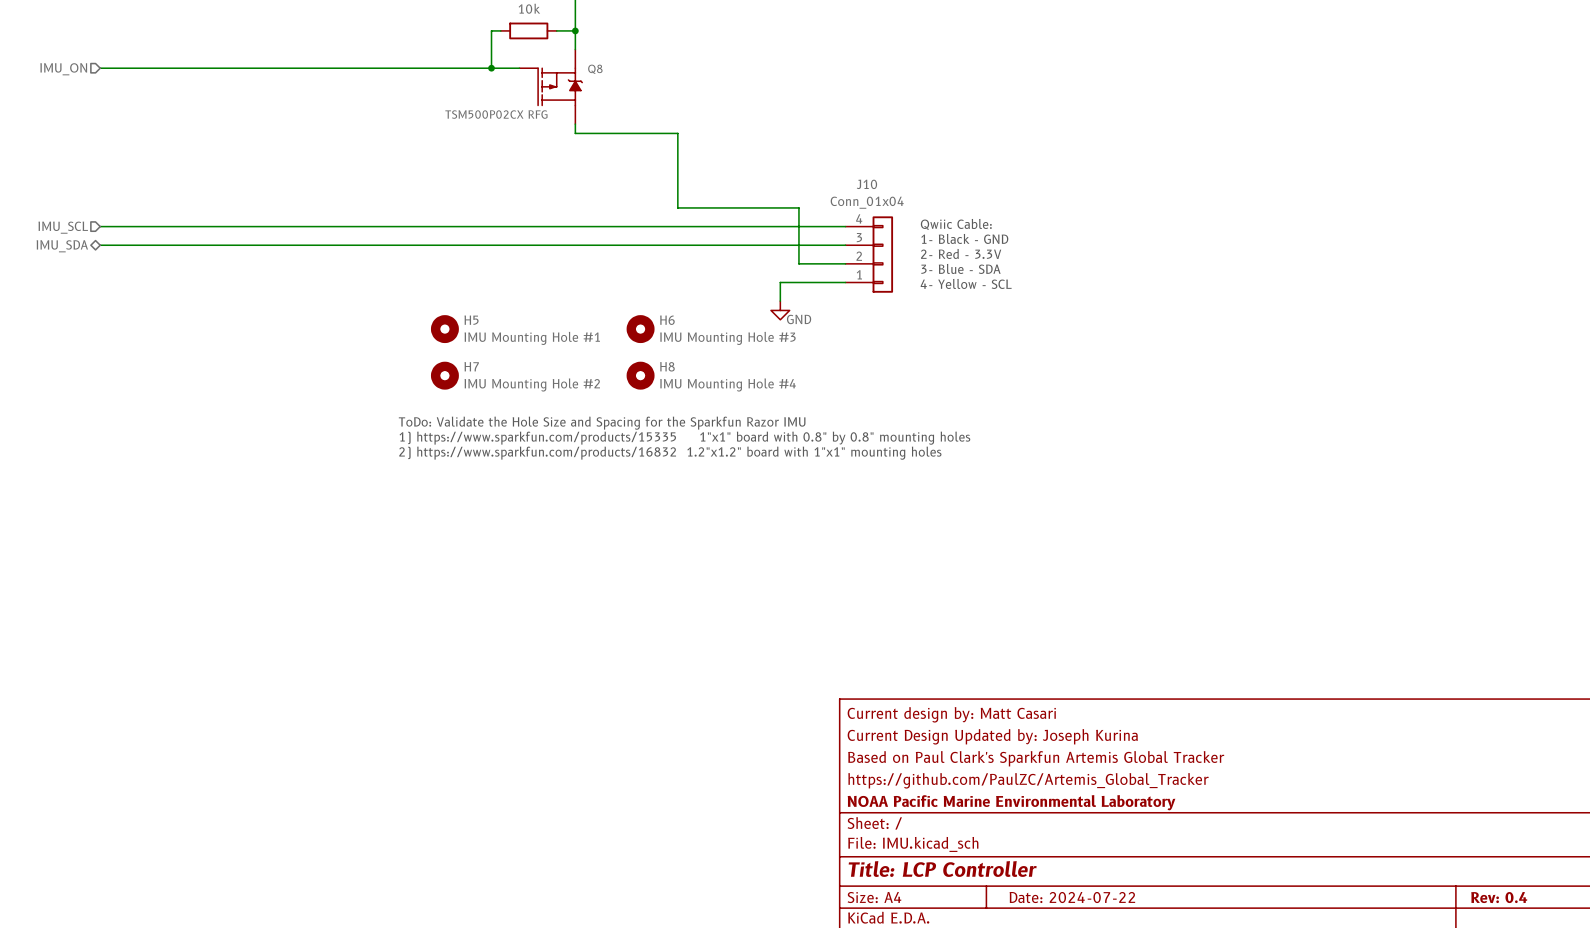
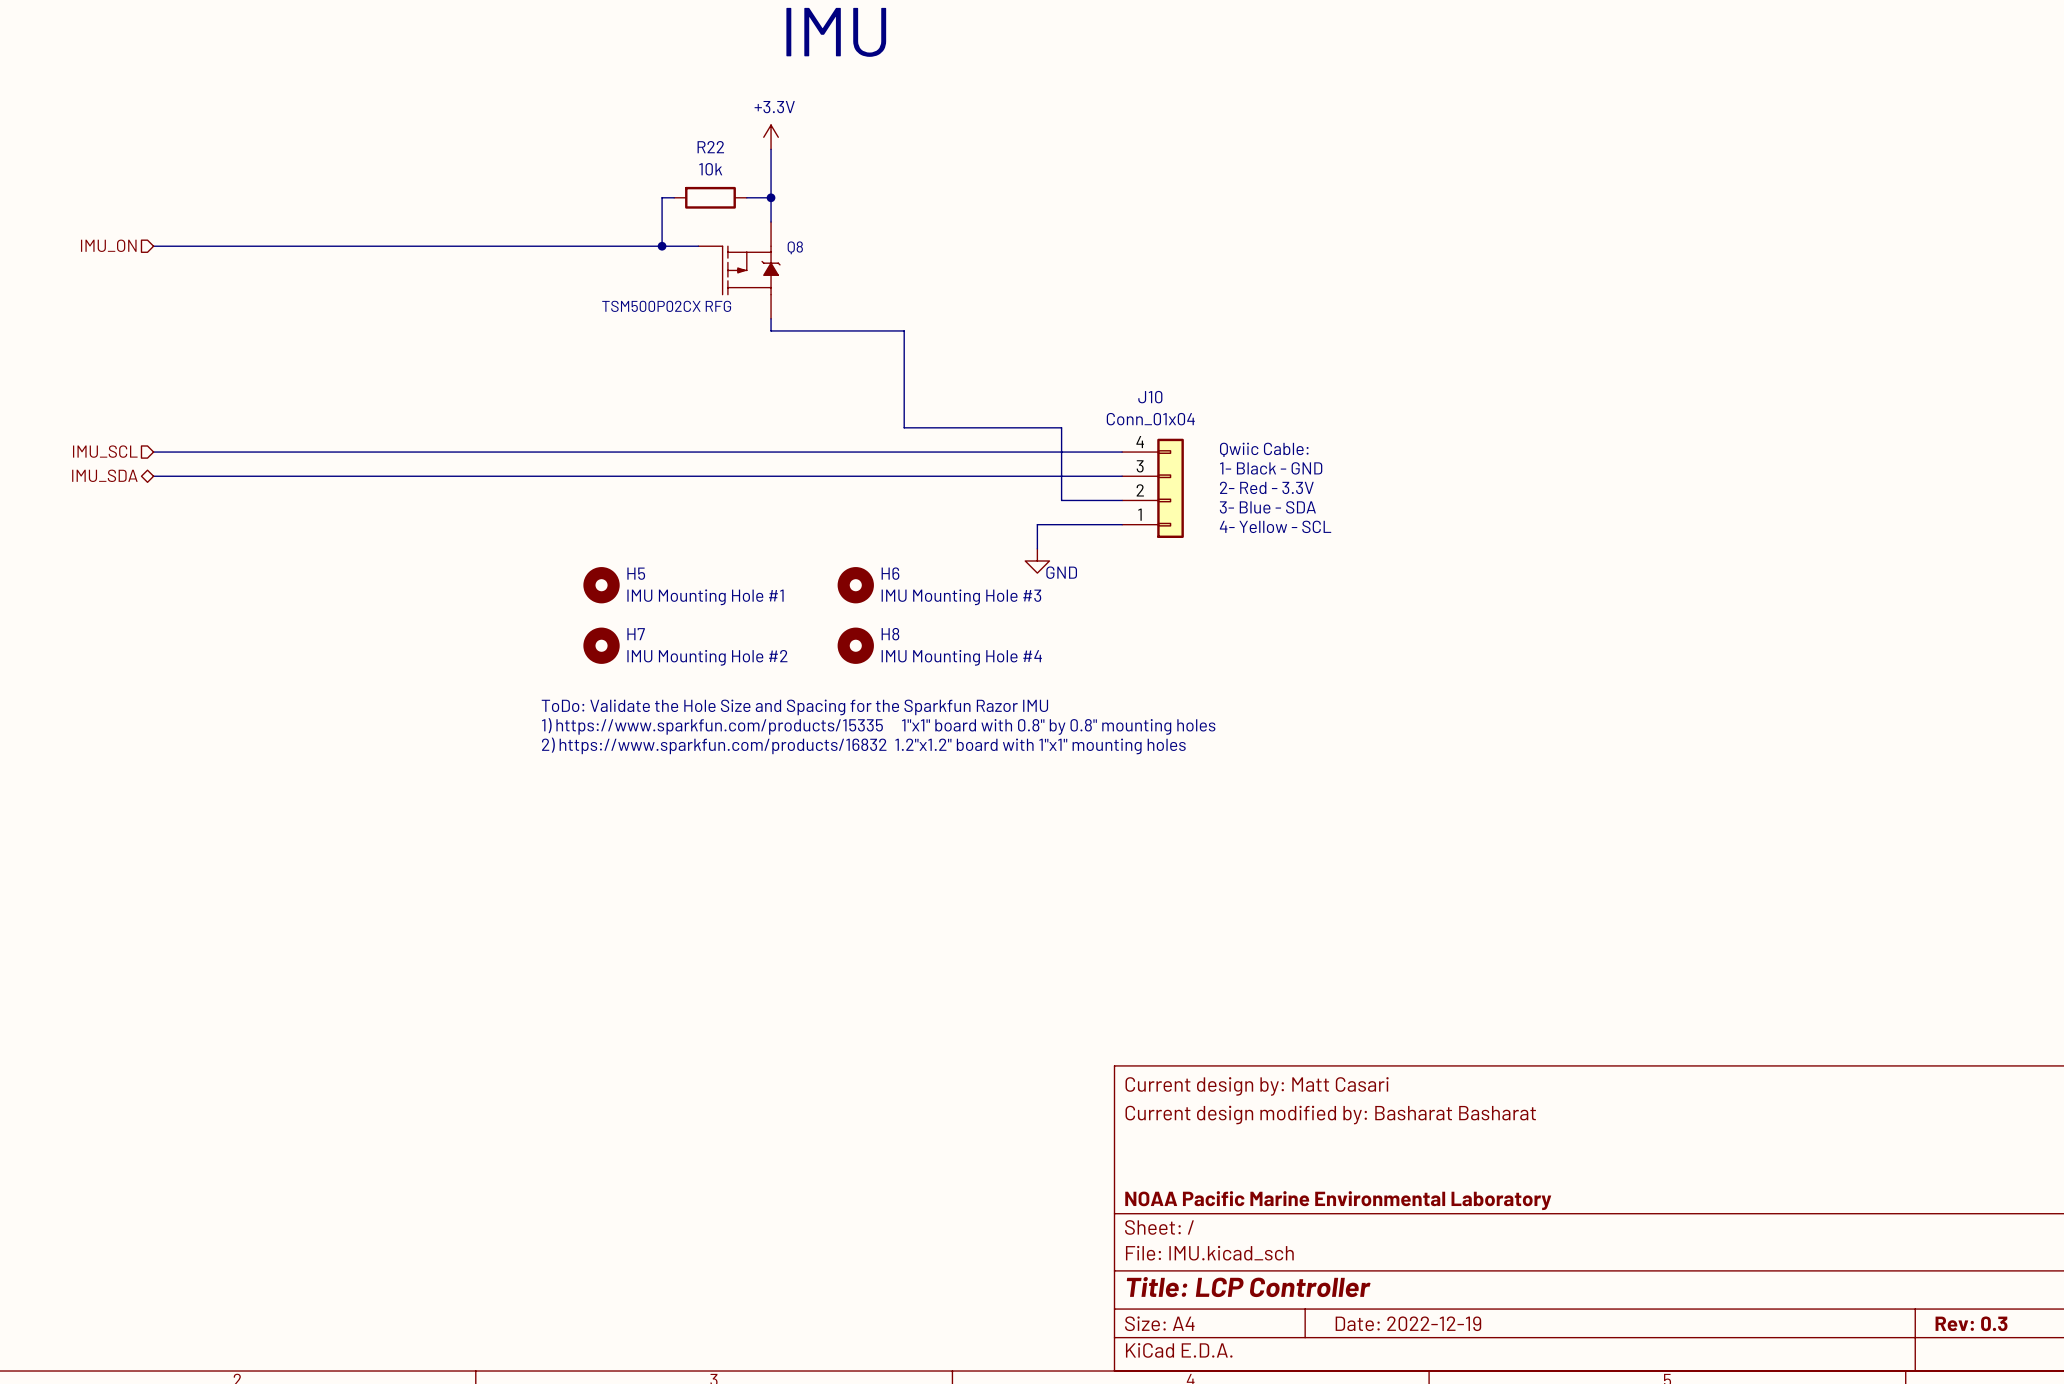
title block: Current Design Updated by: Joseph Kurina (992, 736) -> Current design modified by: Basharat Basharat (1330, 1115)
title block: Based on Paul Clark's Sparkfun Artemis Global Tracker (1036, 758) -> none
title block: https://github.com/PaulZC/Artemis_Global_Tracker (1028, 780) -> none
title block: Date: 2024-07-22 (1072, 897) -> Date: 2022-12-19 (1408, 1323)
title block: Rev: 0.4 (1499, 897) -> Rev: 0.3 (1971, 1323)

